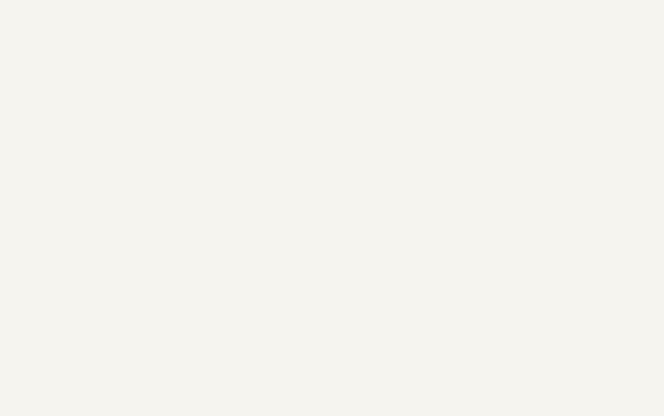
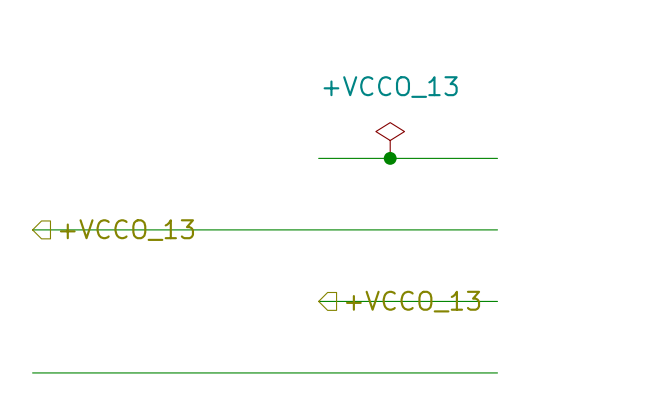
power symbol: none -> +VCCO_13 (390, 140)
wire: none -> (318, 158) (497, 158)
junction: none -> (390, 158)
wire: none -> (32, 229) (497, 229)
hierarchical label: none -> +VCCO_13 (126, 230)
hierarchical label: none -> +VCCO_13 (413, 301)
wire: none -> (318, 301) (497, 301)
wire: none -> (32, 372) (497, 372)

